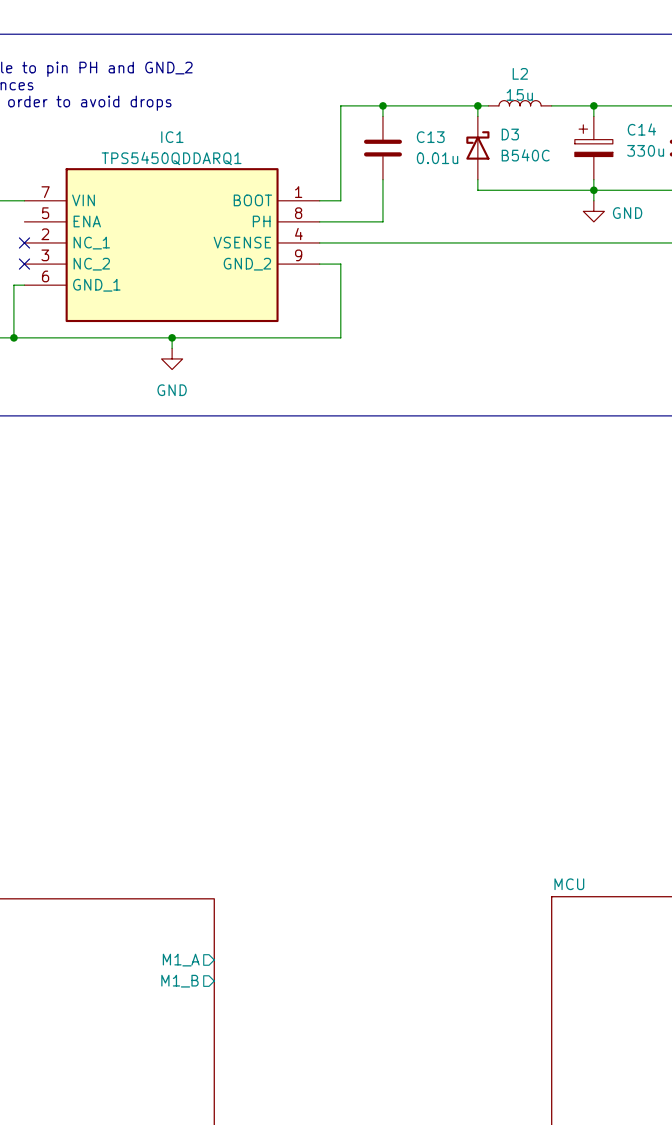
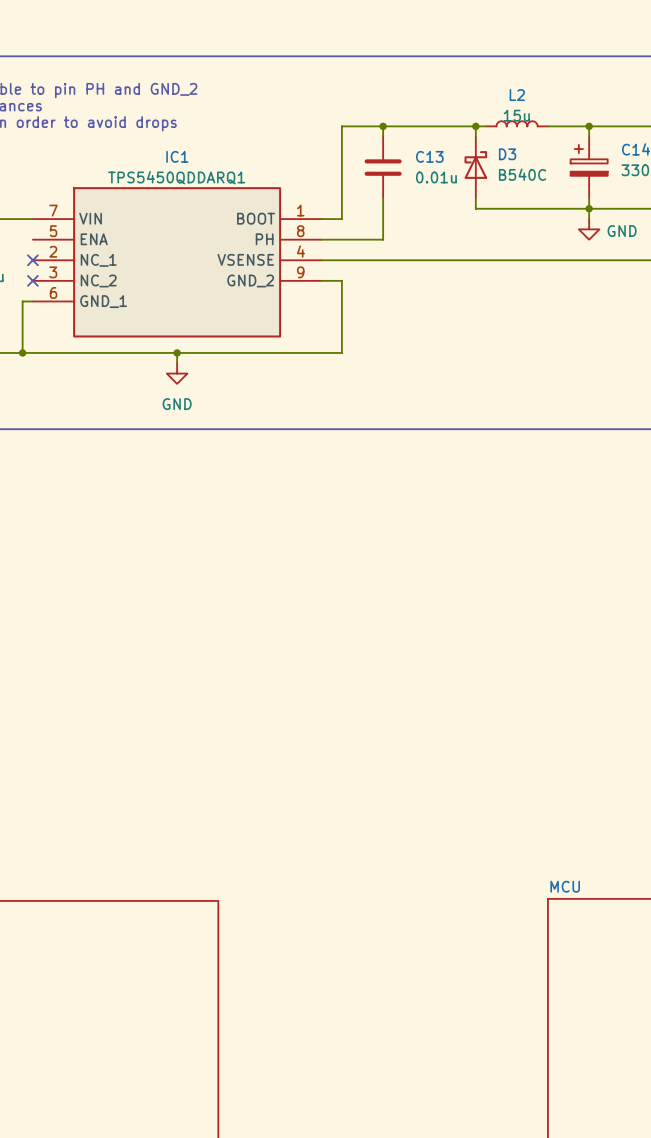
sheet pin: M1_A (181, 960) -> none
sheet pin: M1_B (179, 981) -> none

